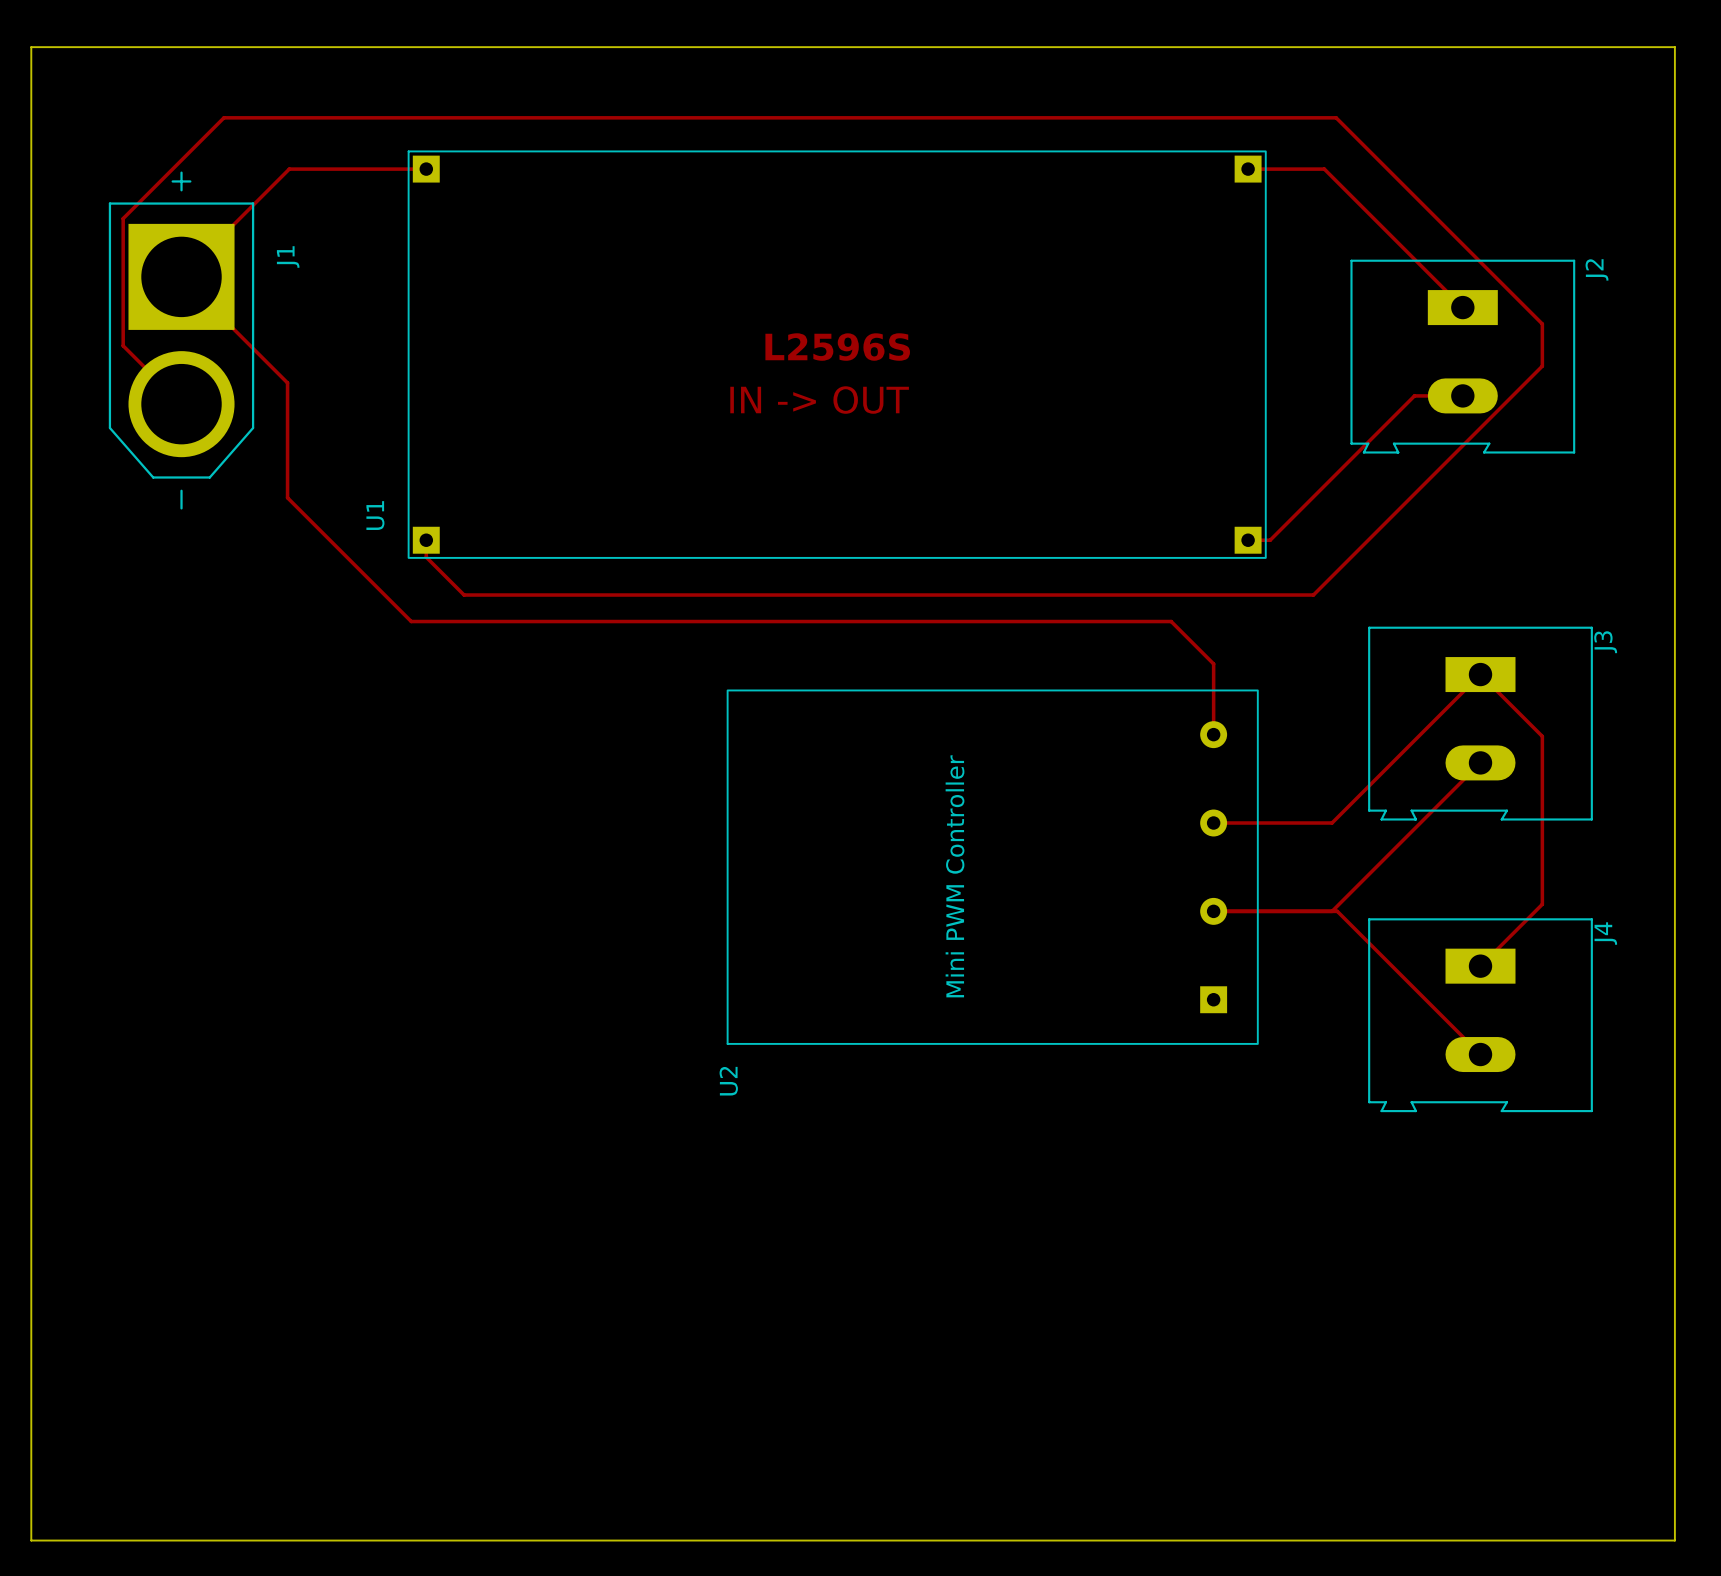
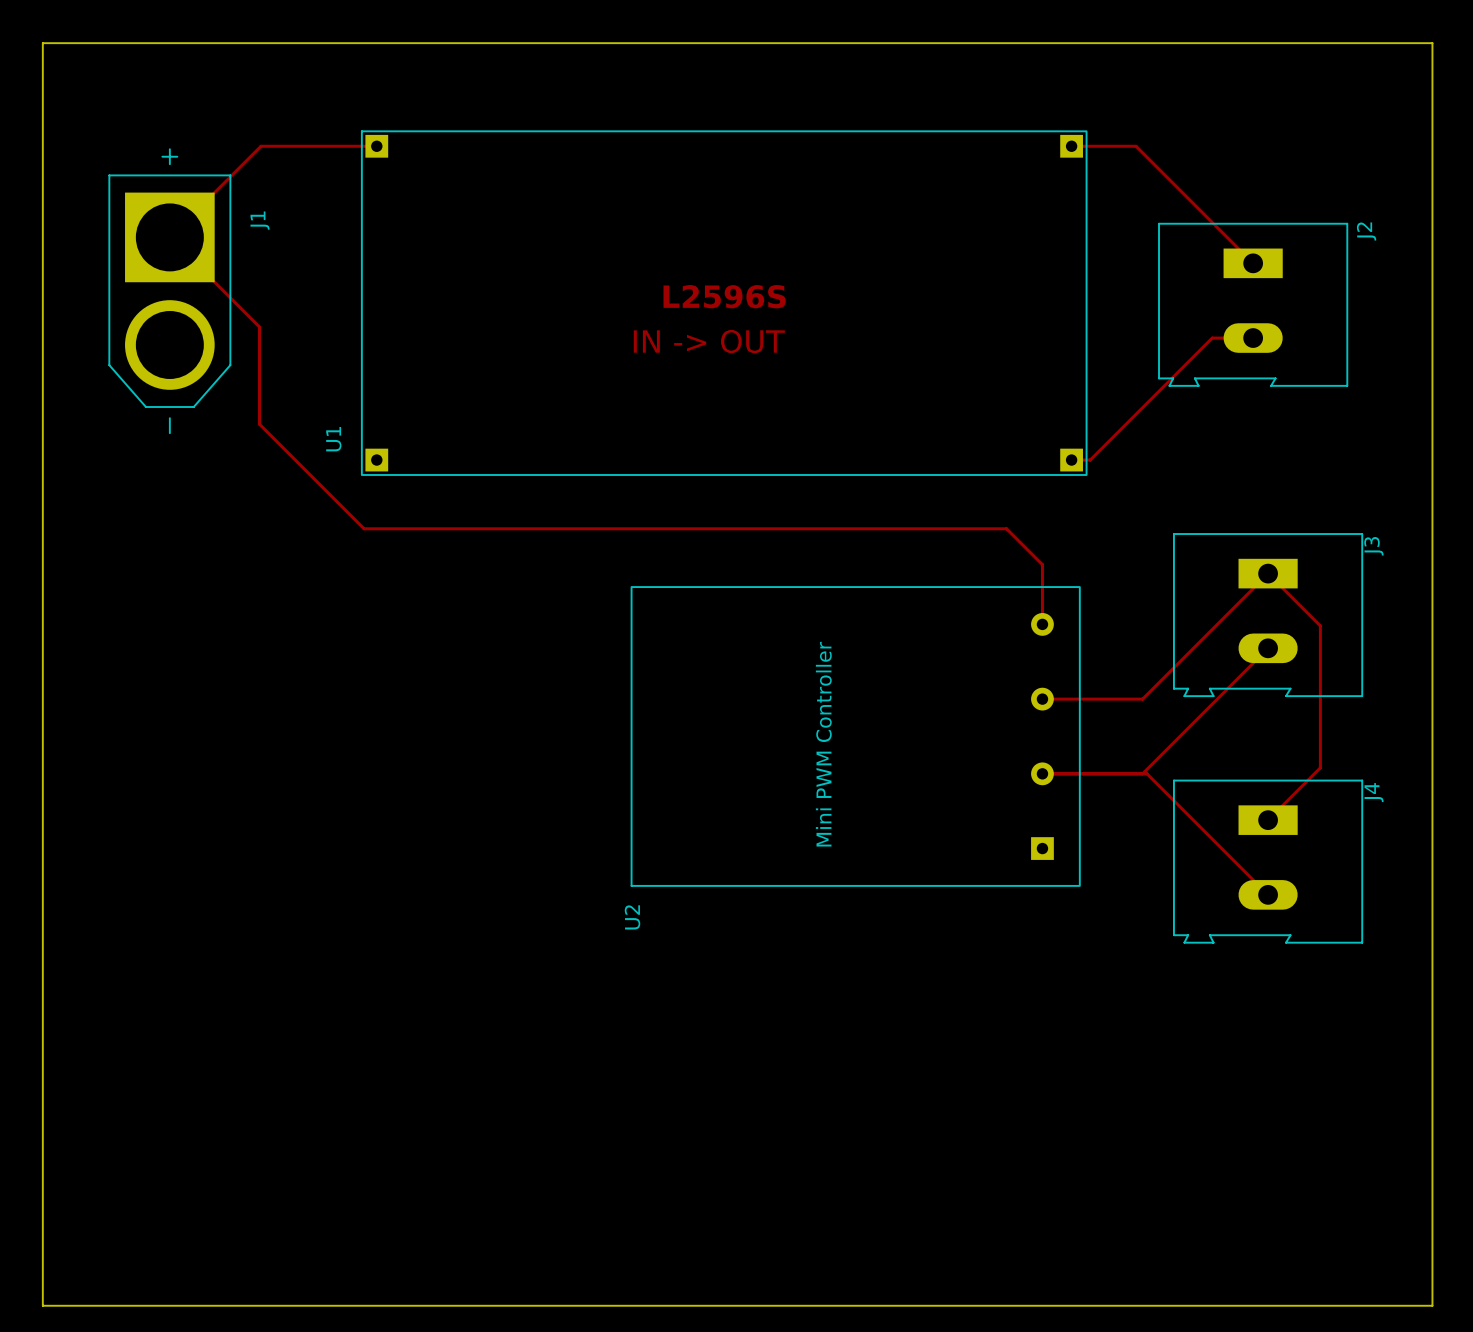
top track: (181, 404) (123, 345) (123, 218) (223, 117) (1336, 117) (1542, 324) (1542, 366) (1313, 595) (464, 595) (426, 557) (426, 540) -> none

